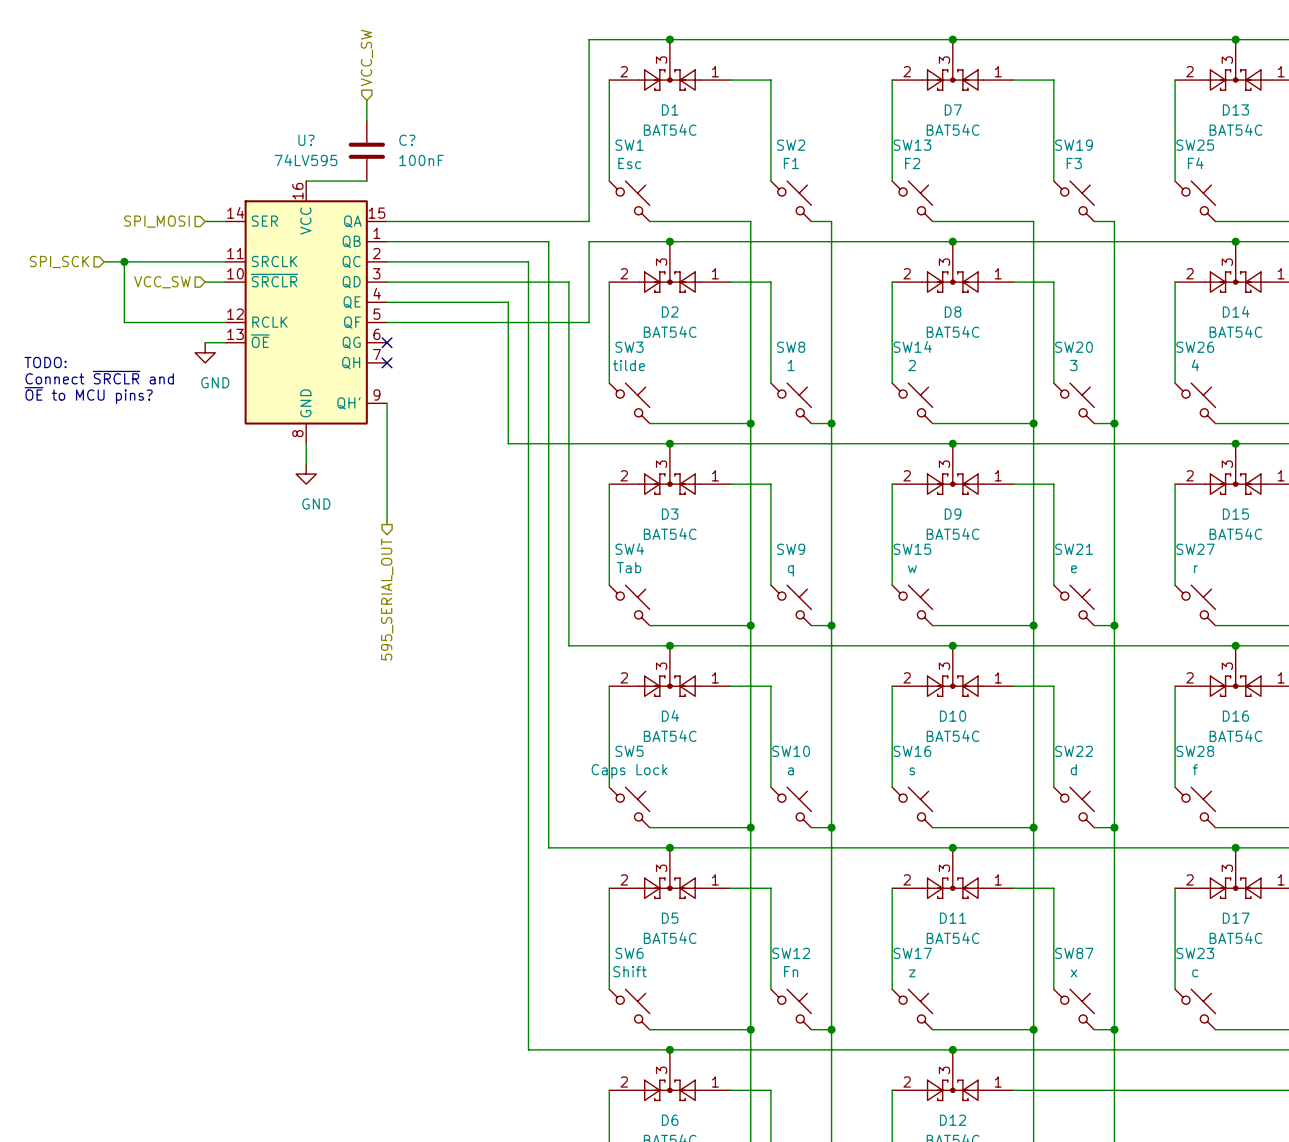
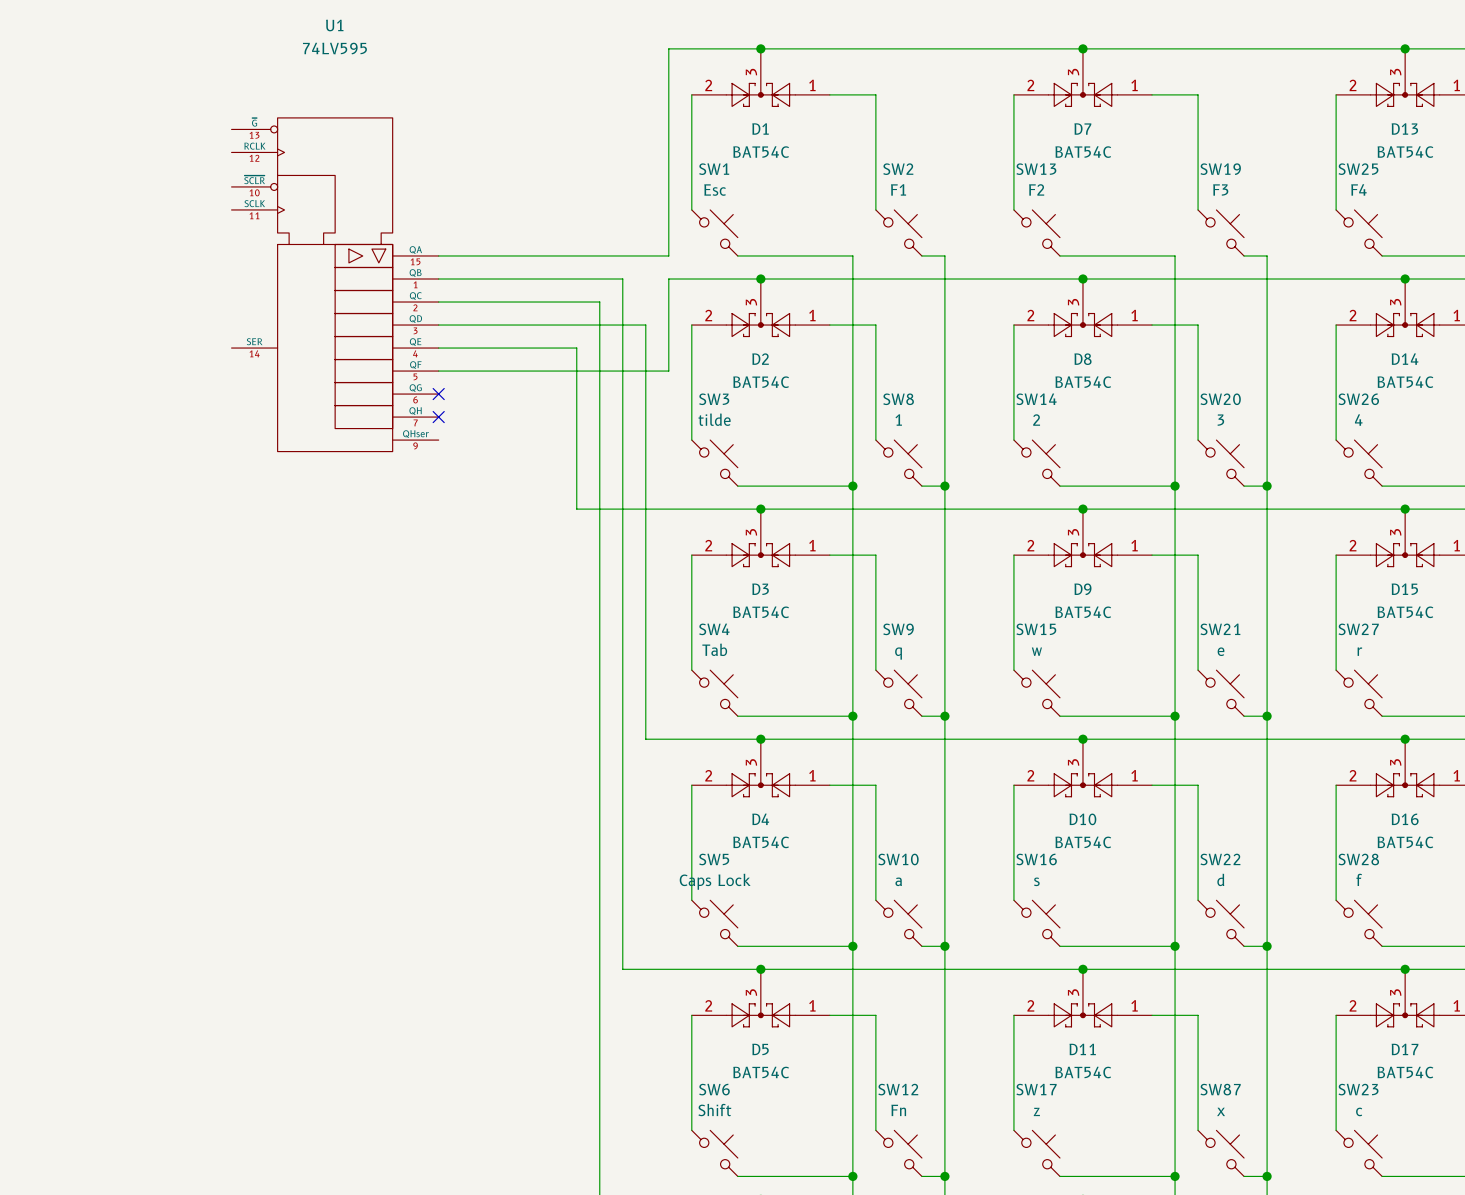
hierarchical label: VCC_SW (366, 58) -> none
wire: (366, 100) (366, 120) -> none
C?: 100nF (366, 150) -> none
wire: (306, 181) (366, 181) -> none
hierarchical label: SPI_MOSI (156, 221) -> none
wire: (205, 221) (225, 221) -> none
U1: none -> 74LV595 (335, 284)
wire: (104, 261) (225, 261) -> none
wire: (124, 261) (124, 322) (225, 322) -> none
junction: (124, 261) -> none
hierarchical label: SPI_SCK (59, 262) -> none
hierarchical label: VCC_SW (162, 282) -> none
wire: (205, 282) (225, 282) -> none
U?: 74LV595 (306, 312) -> none
wire: (205, 342) (225, 342) -> none
power symbol: GND (205, 352) -> none
text: TODO: (45, 362) -> none
text: Connect ~{SRCLR} and (99, 377) -> none
text: ~{OE} to MCU pins? (88, 395) -> none
wire: (387, 403) (387, 524) -> none
wire: (306, 443) (306, 463) -> none
power symbol: GND (306, 474) -> none
hierarchical label: 595_SERIAL_OUT (387, 599) -> none

